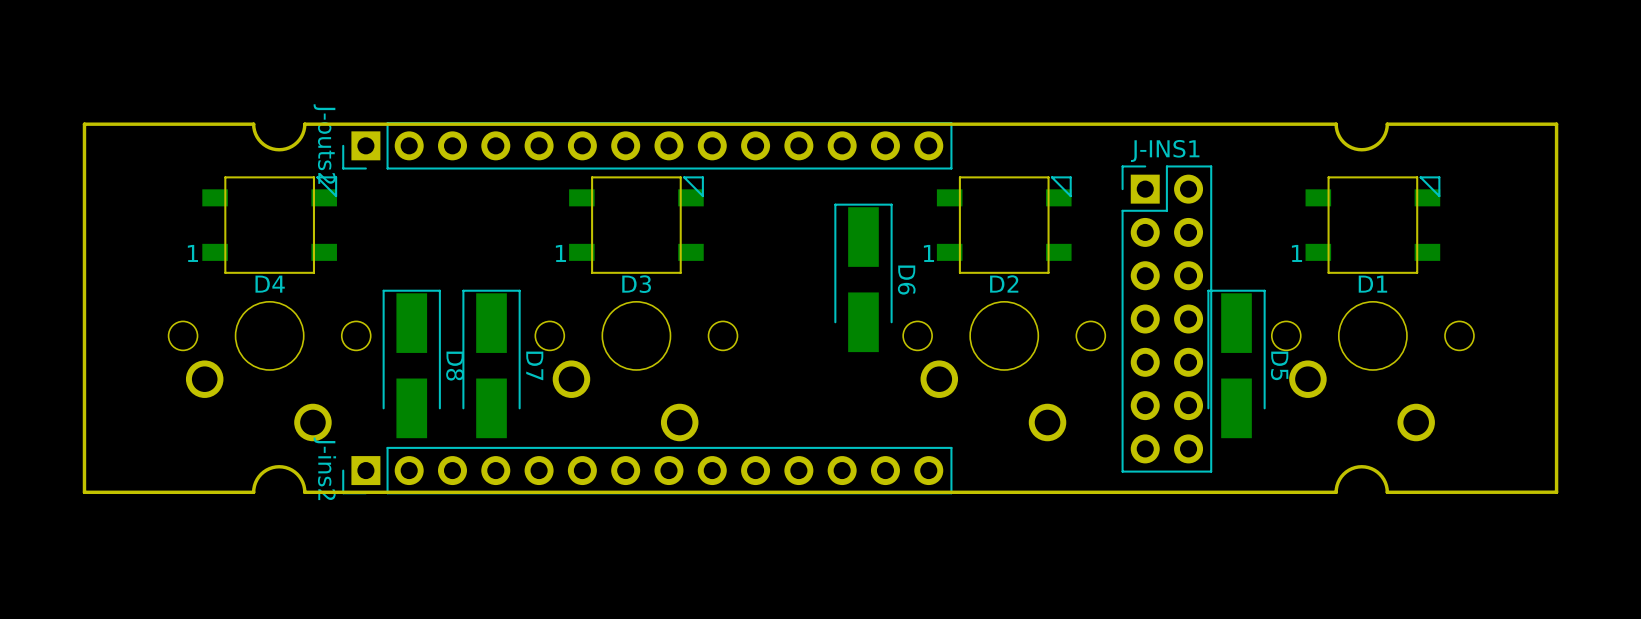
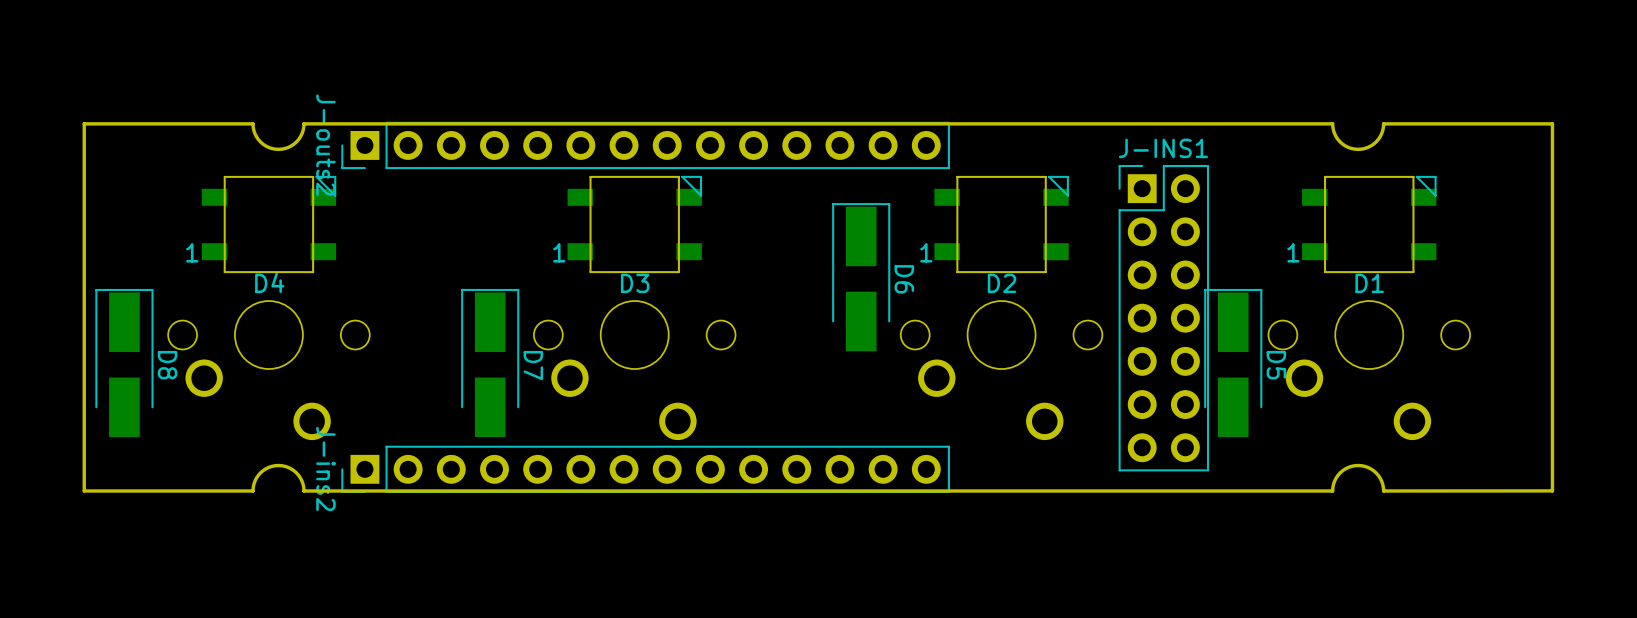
D8 position: (411, 363) -> (124, 362)

